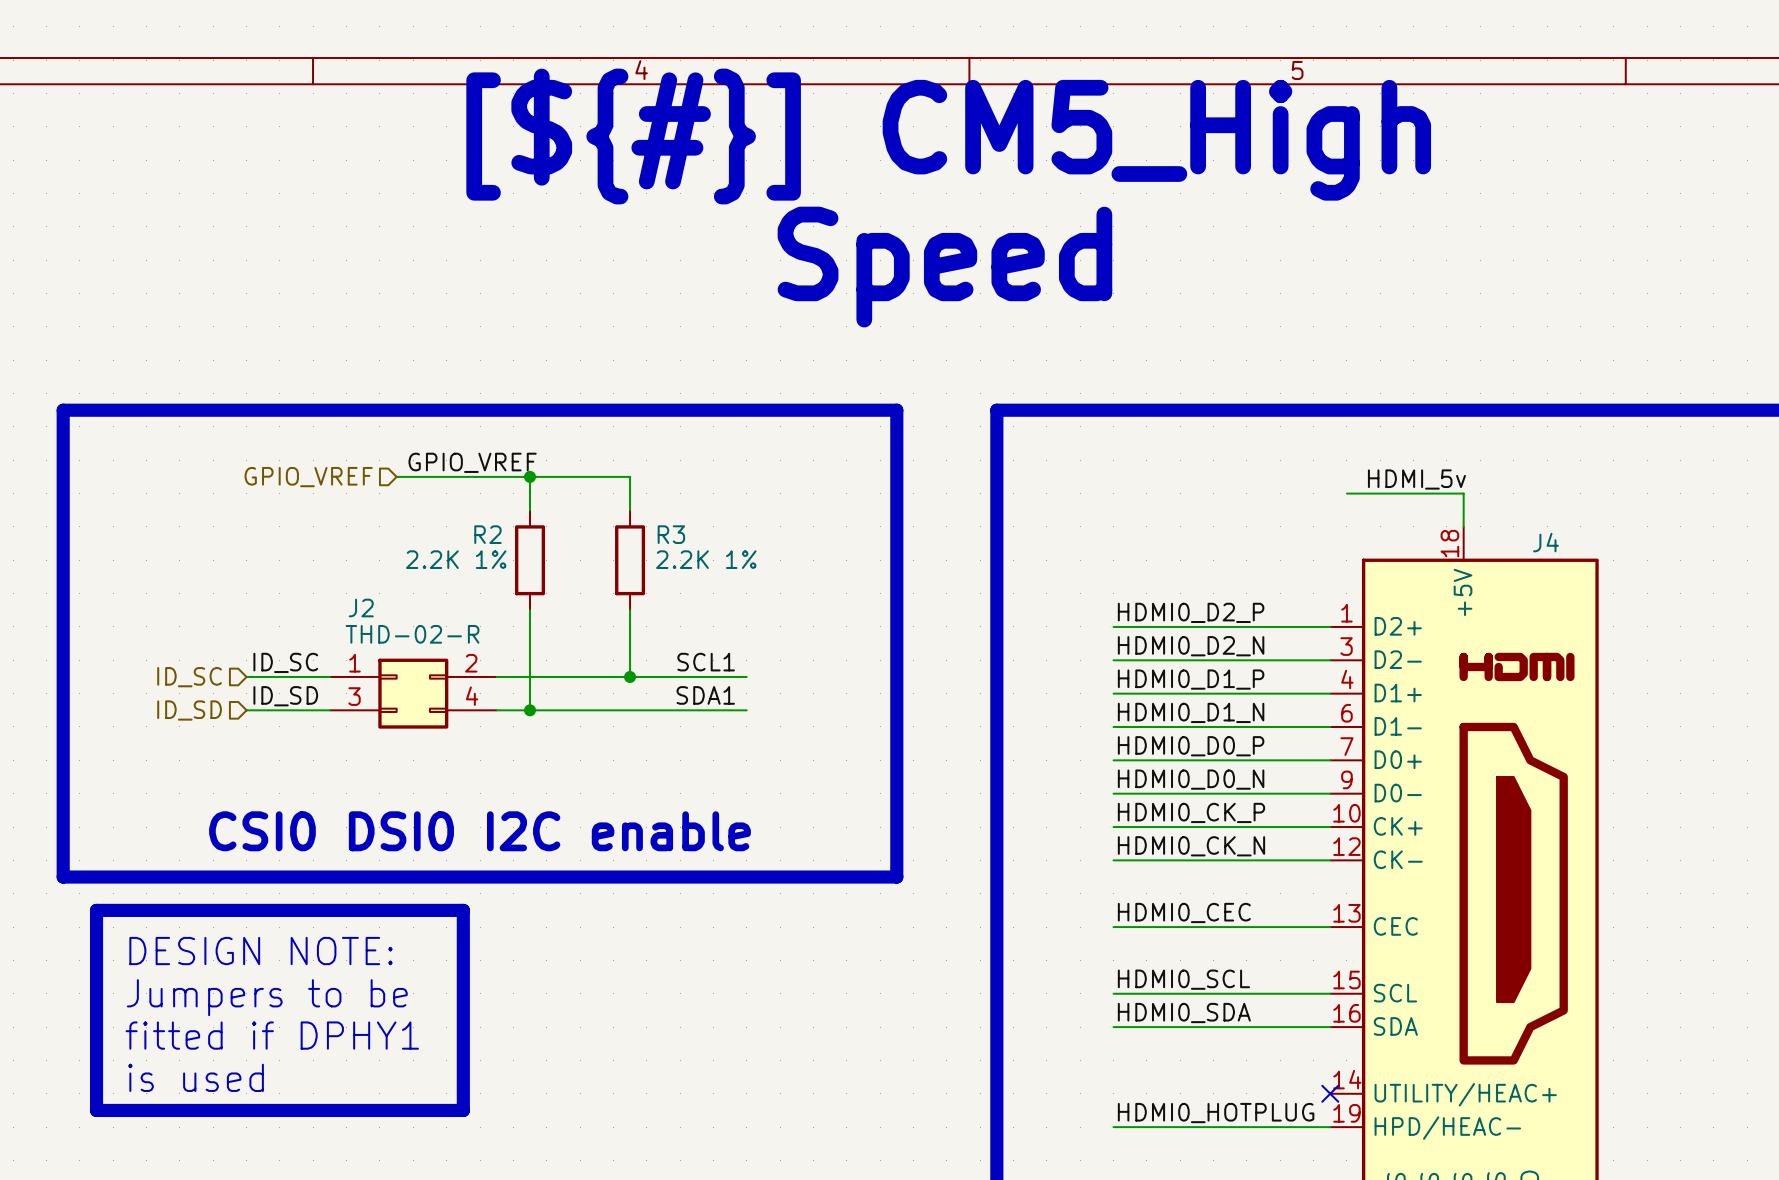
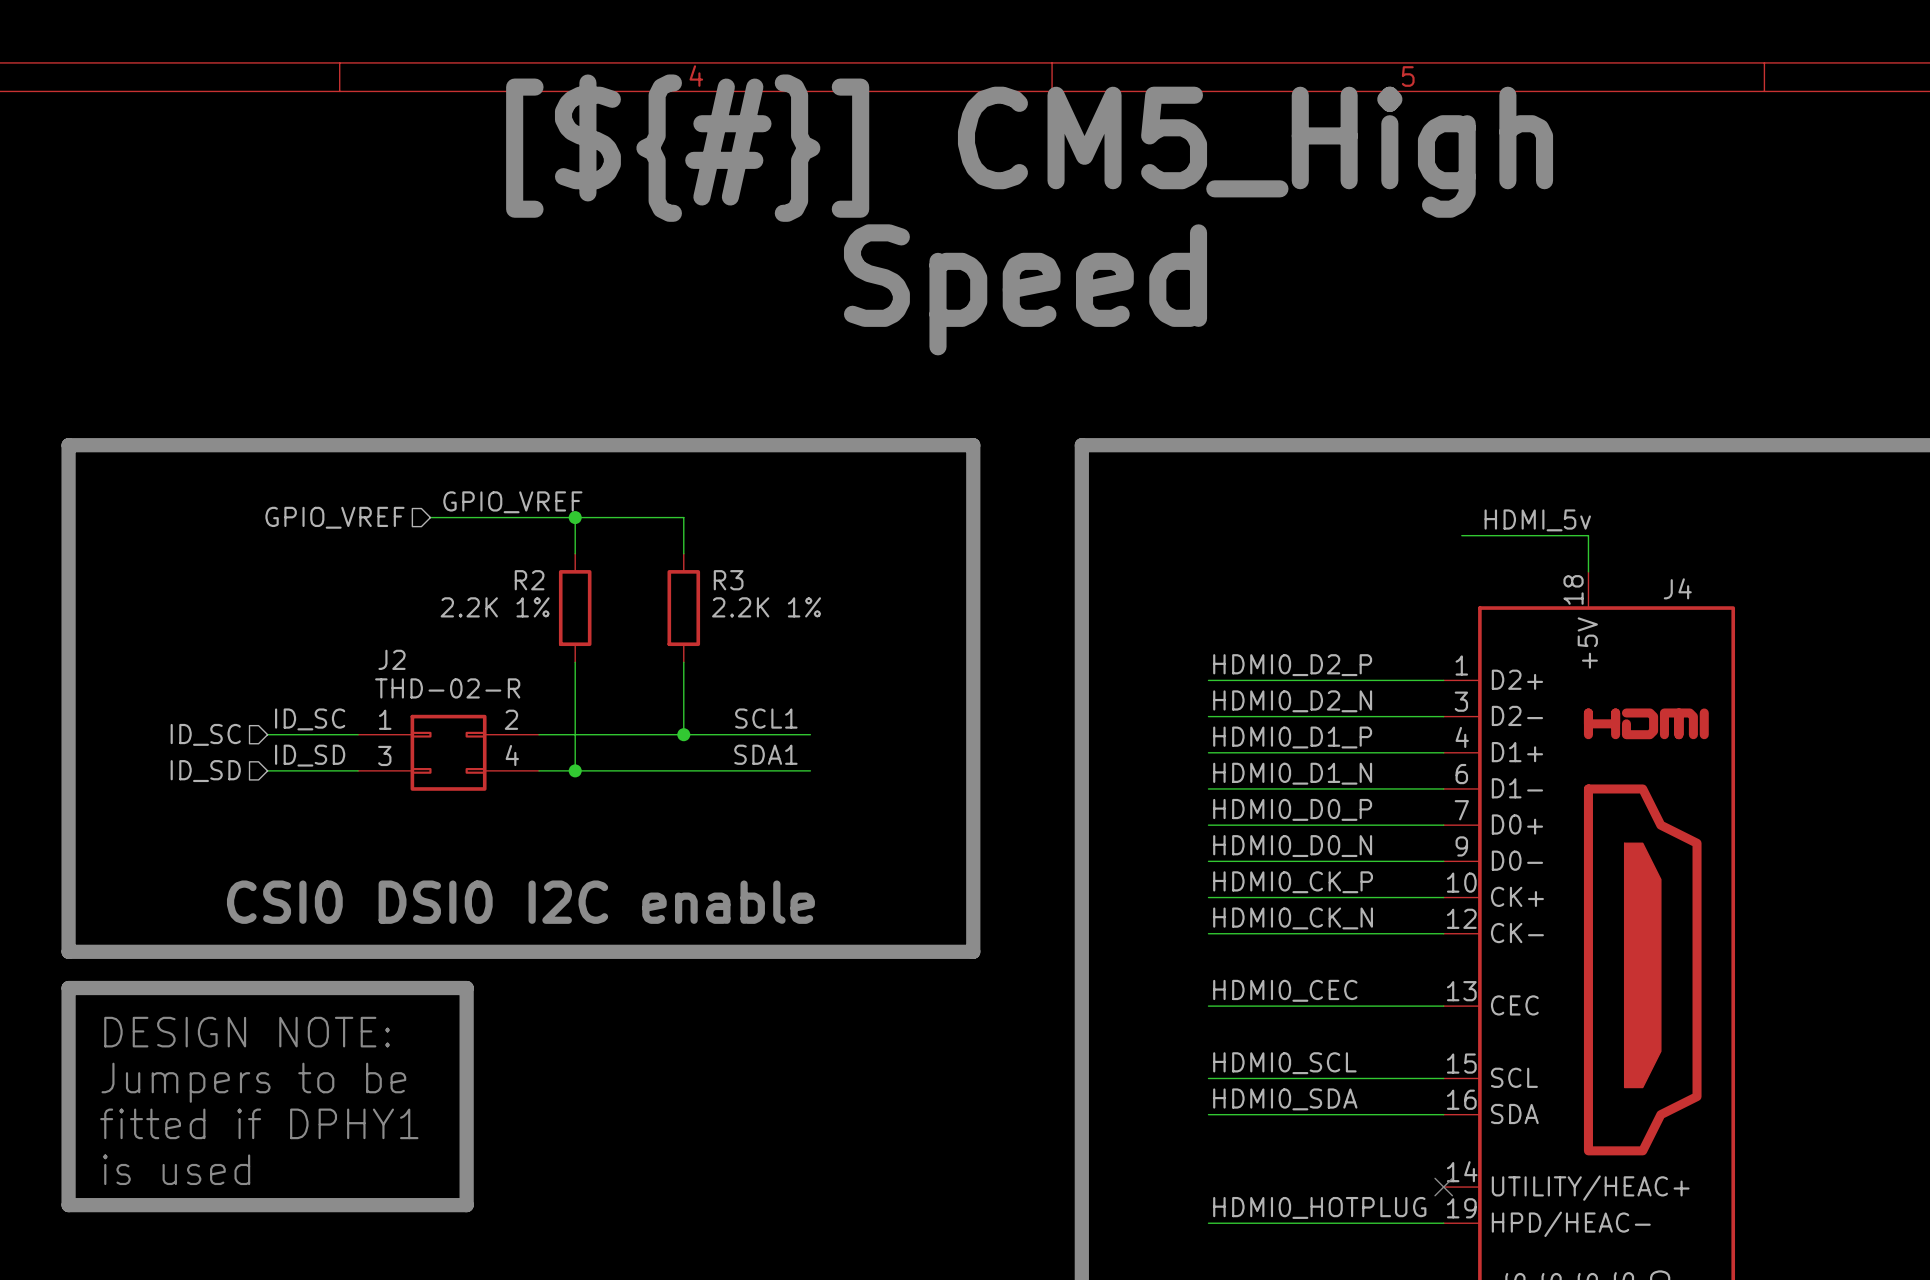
line: (96, 910) (96, 1110) -> (104, 988) (68, 988) (68, 1205) (104, 1205)
line: (429, 910) (463, 910) (463, 1110) (429, 1110) -> (466, 988) (466, 1205)
text position: DESIGN NOTE: (261, 951) -> DESIGN NOTE: (247, 1032)
text position: Jumpers to be (267, 997) -> Jumpers to be (253, 1082)
text position: fitted if DPHY1 (272, 1035) -> fitted if DPHY1 (259, 1123)
text position: is used (196, 1077) -> is used (176, 1169)

